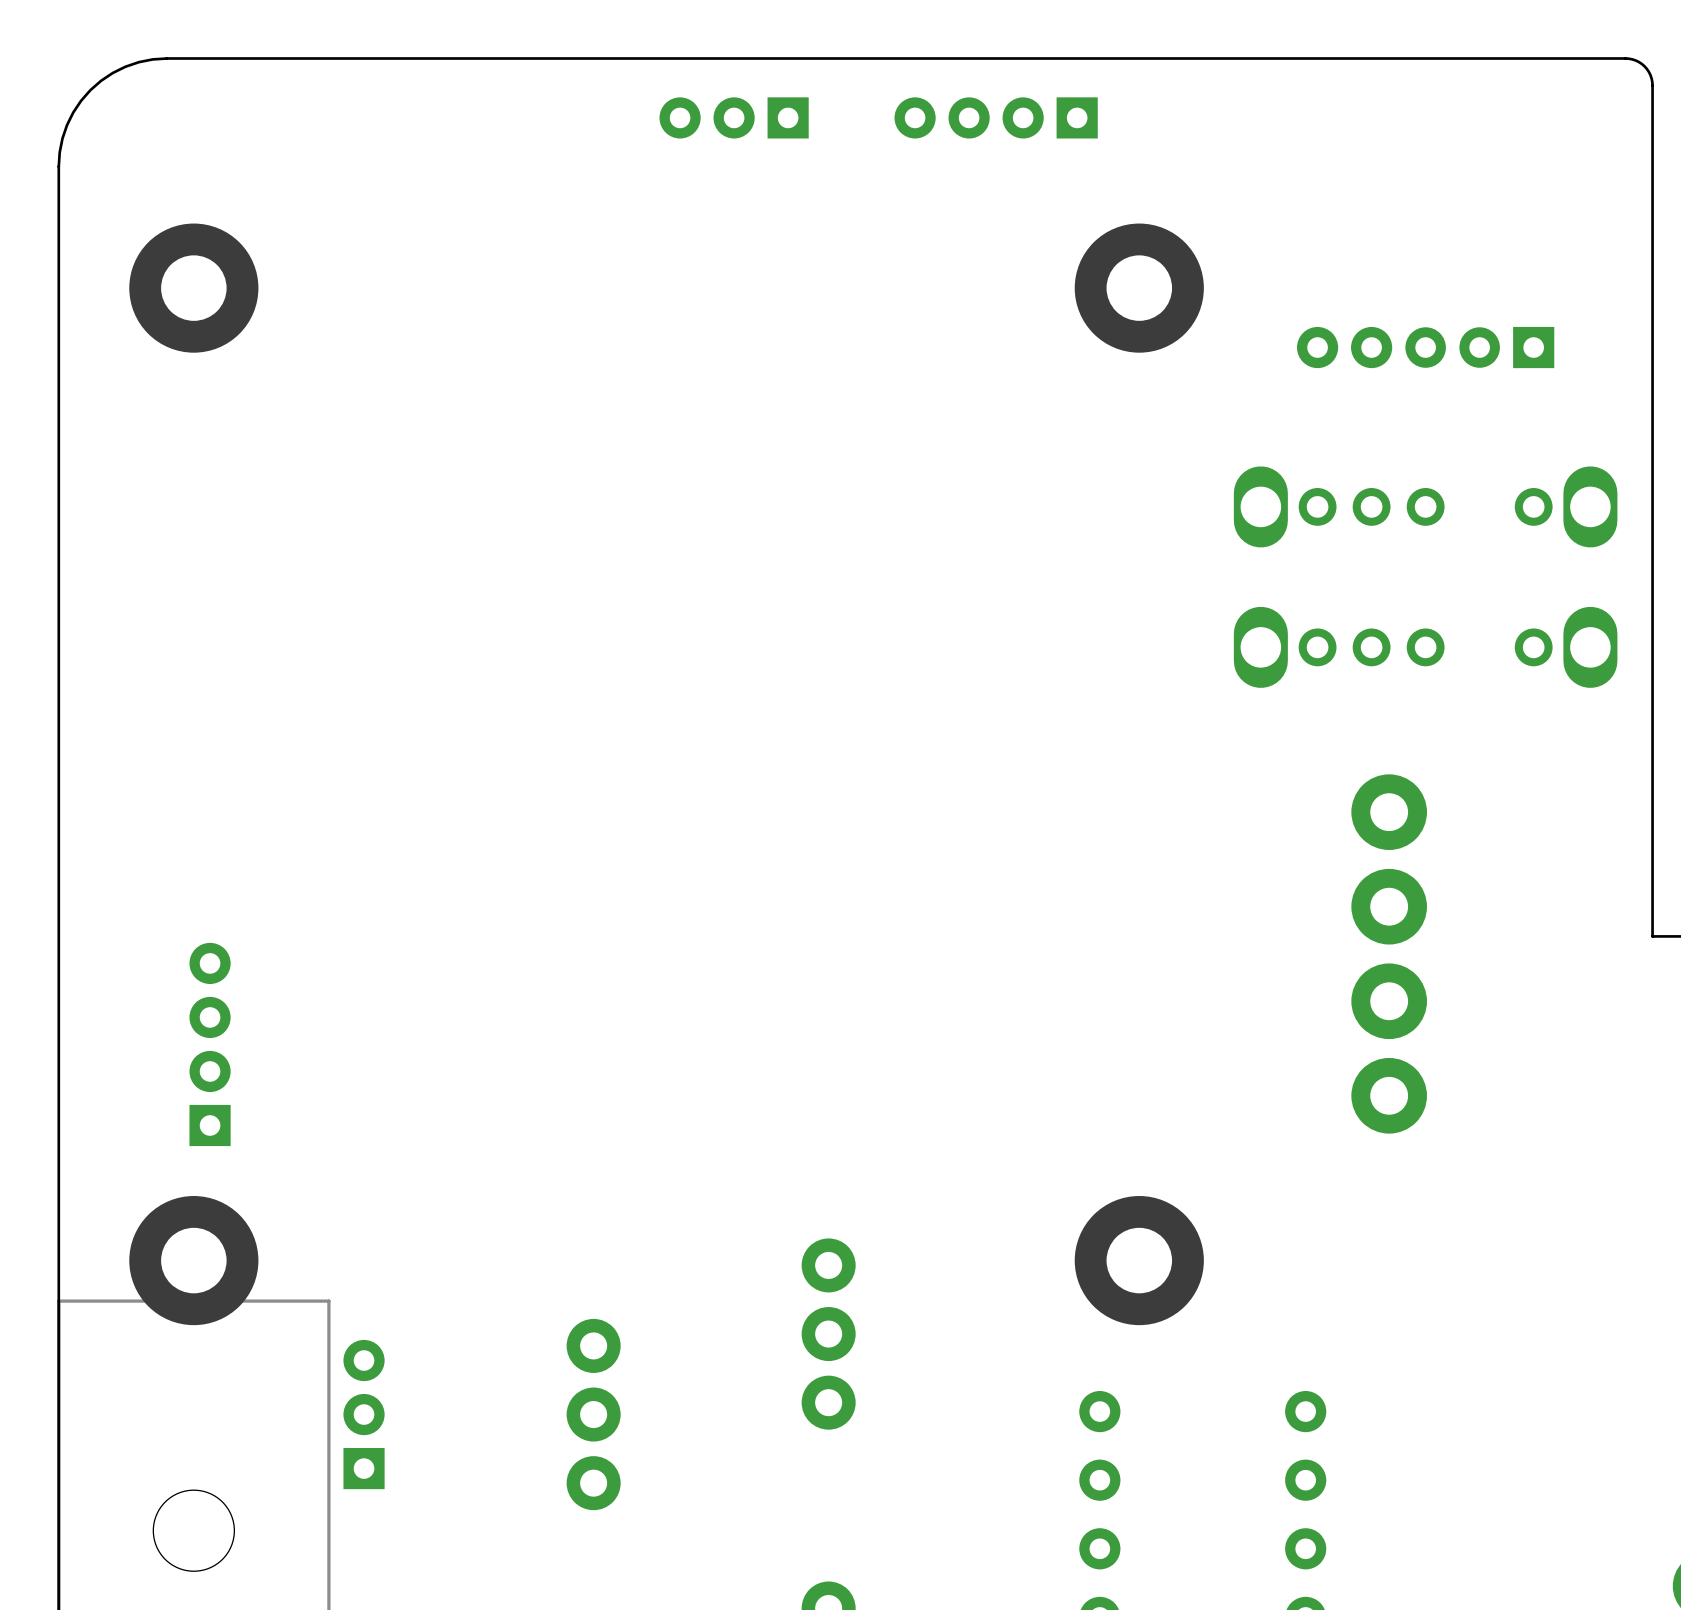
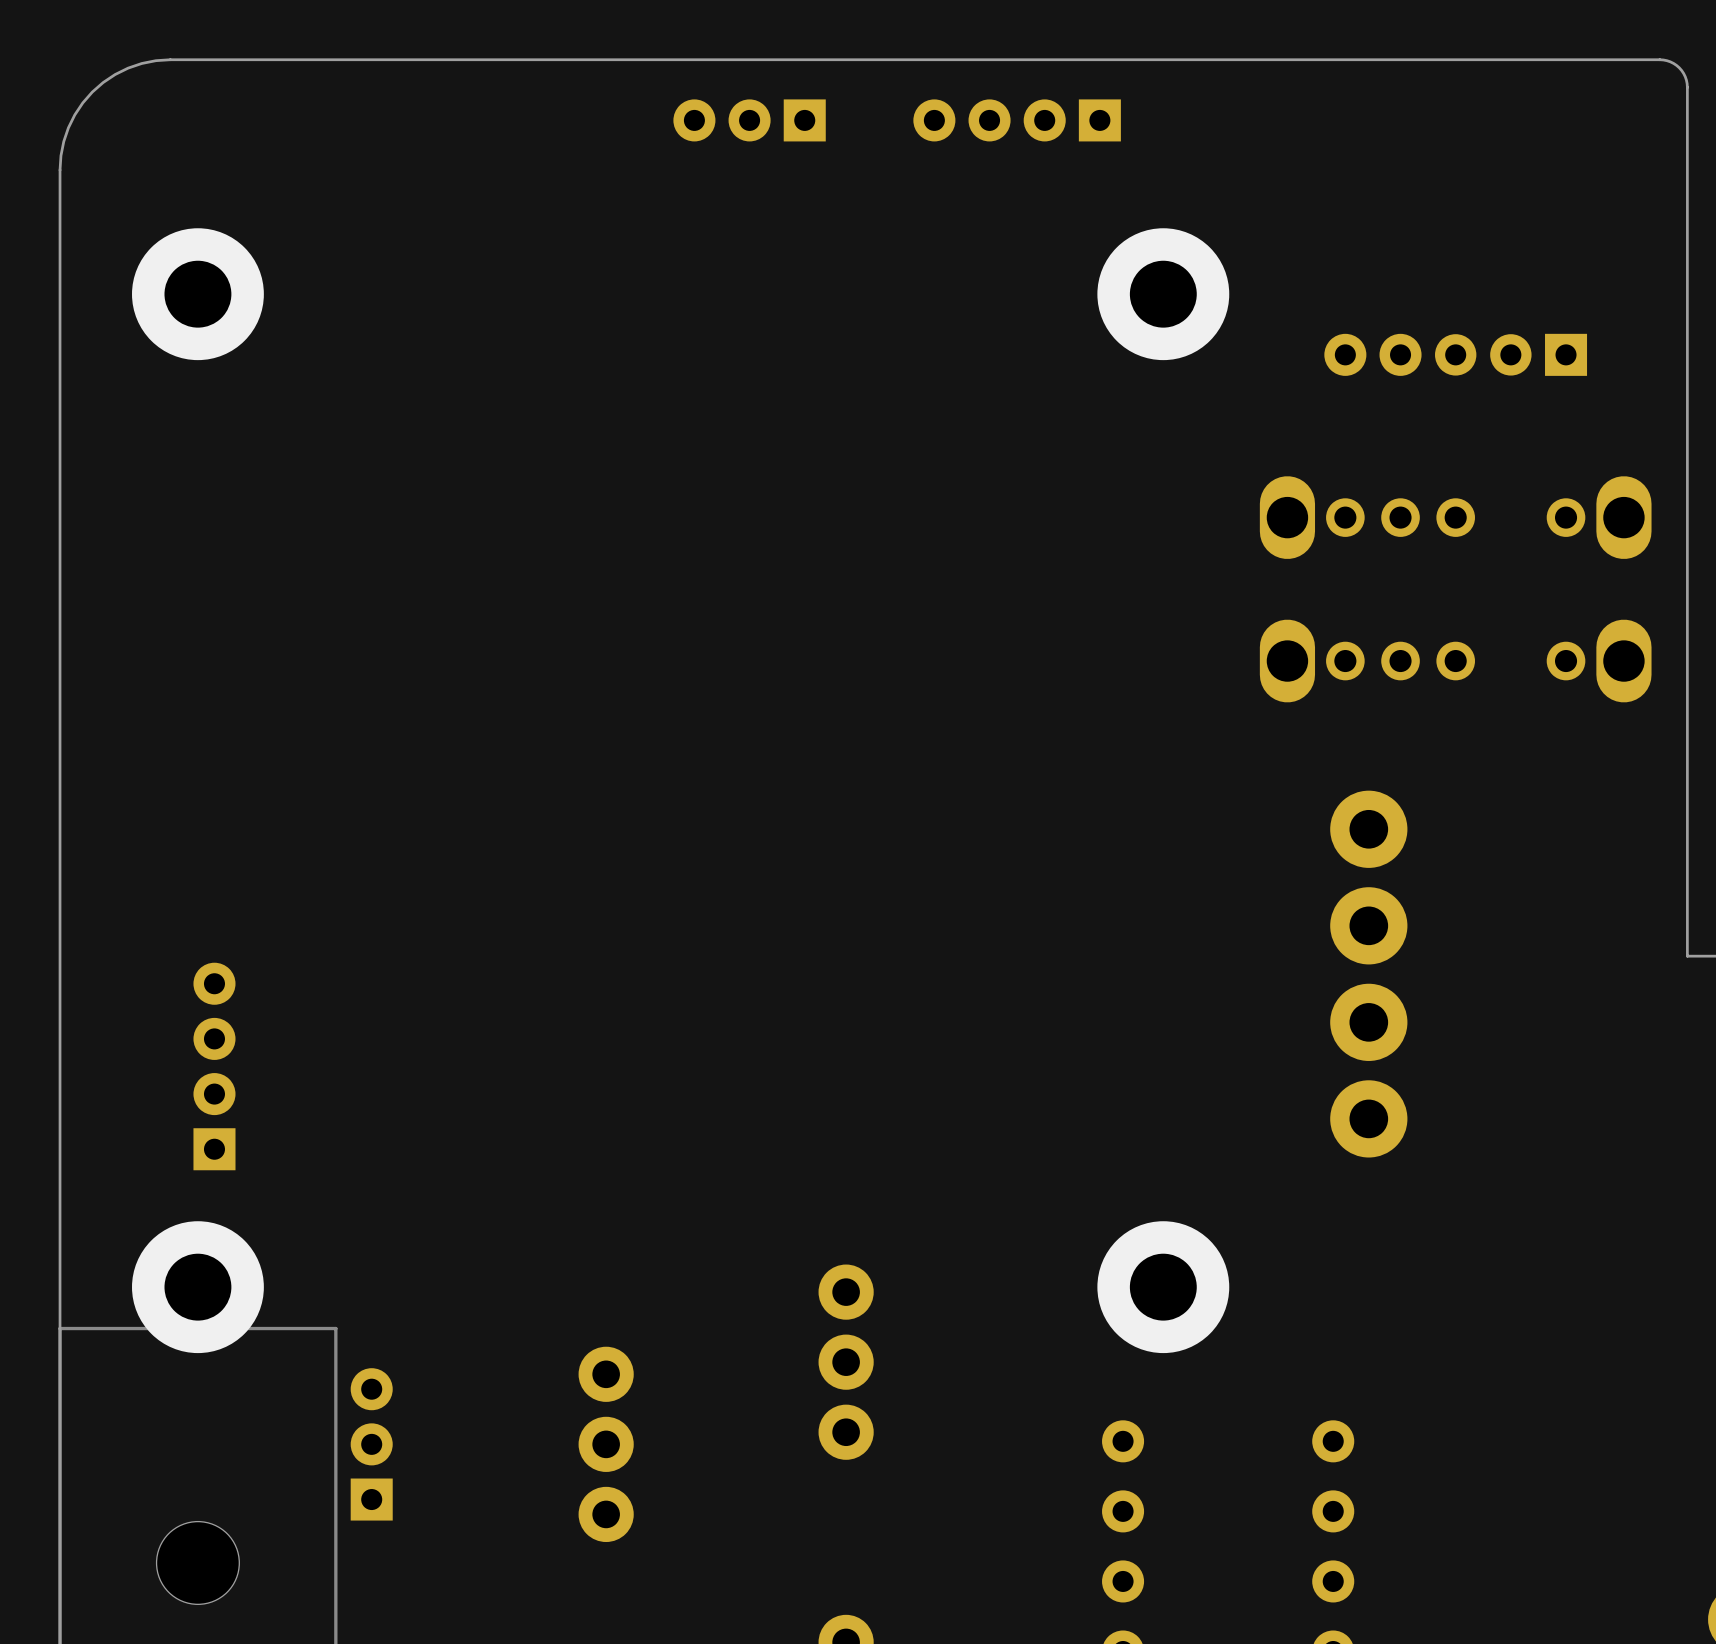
part position: (1389, 953) -> (1368, 974)

